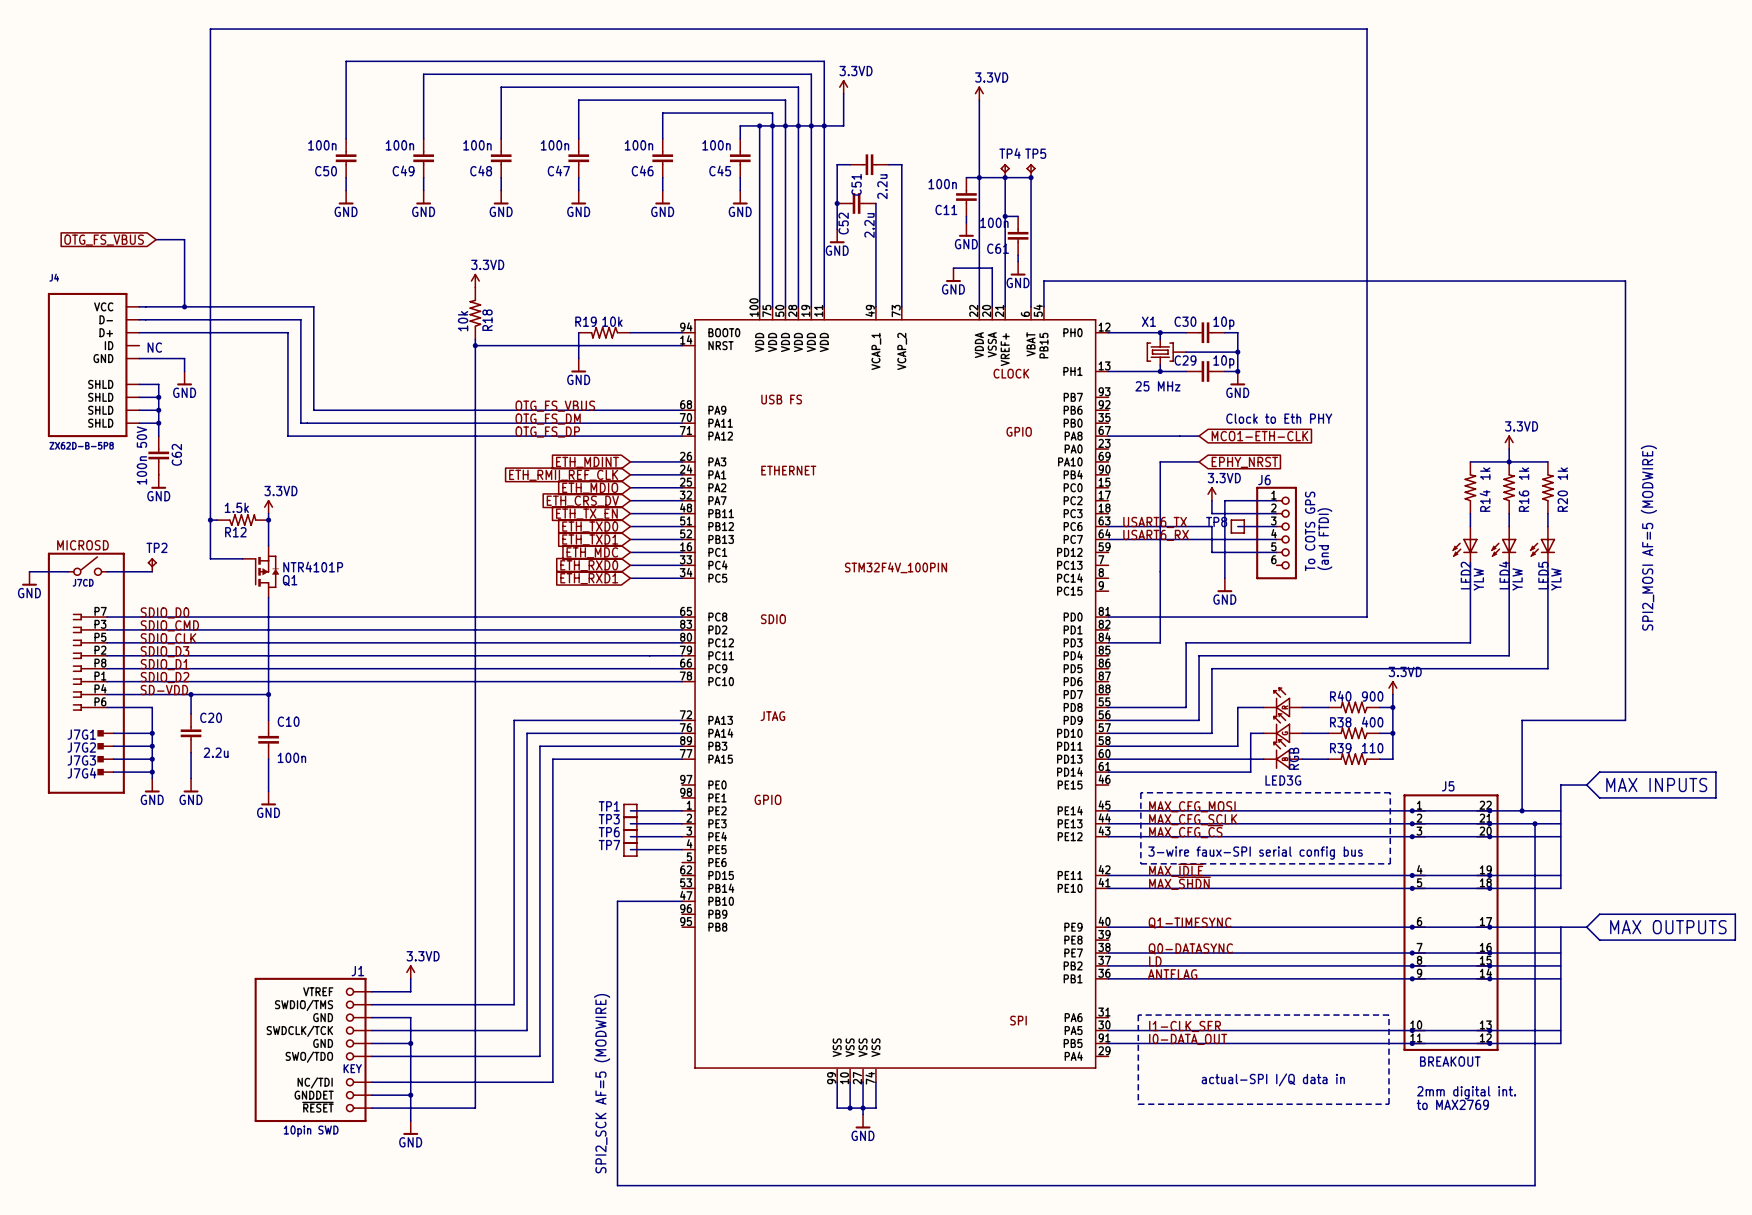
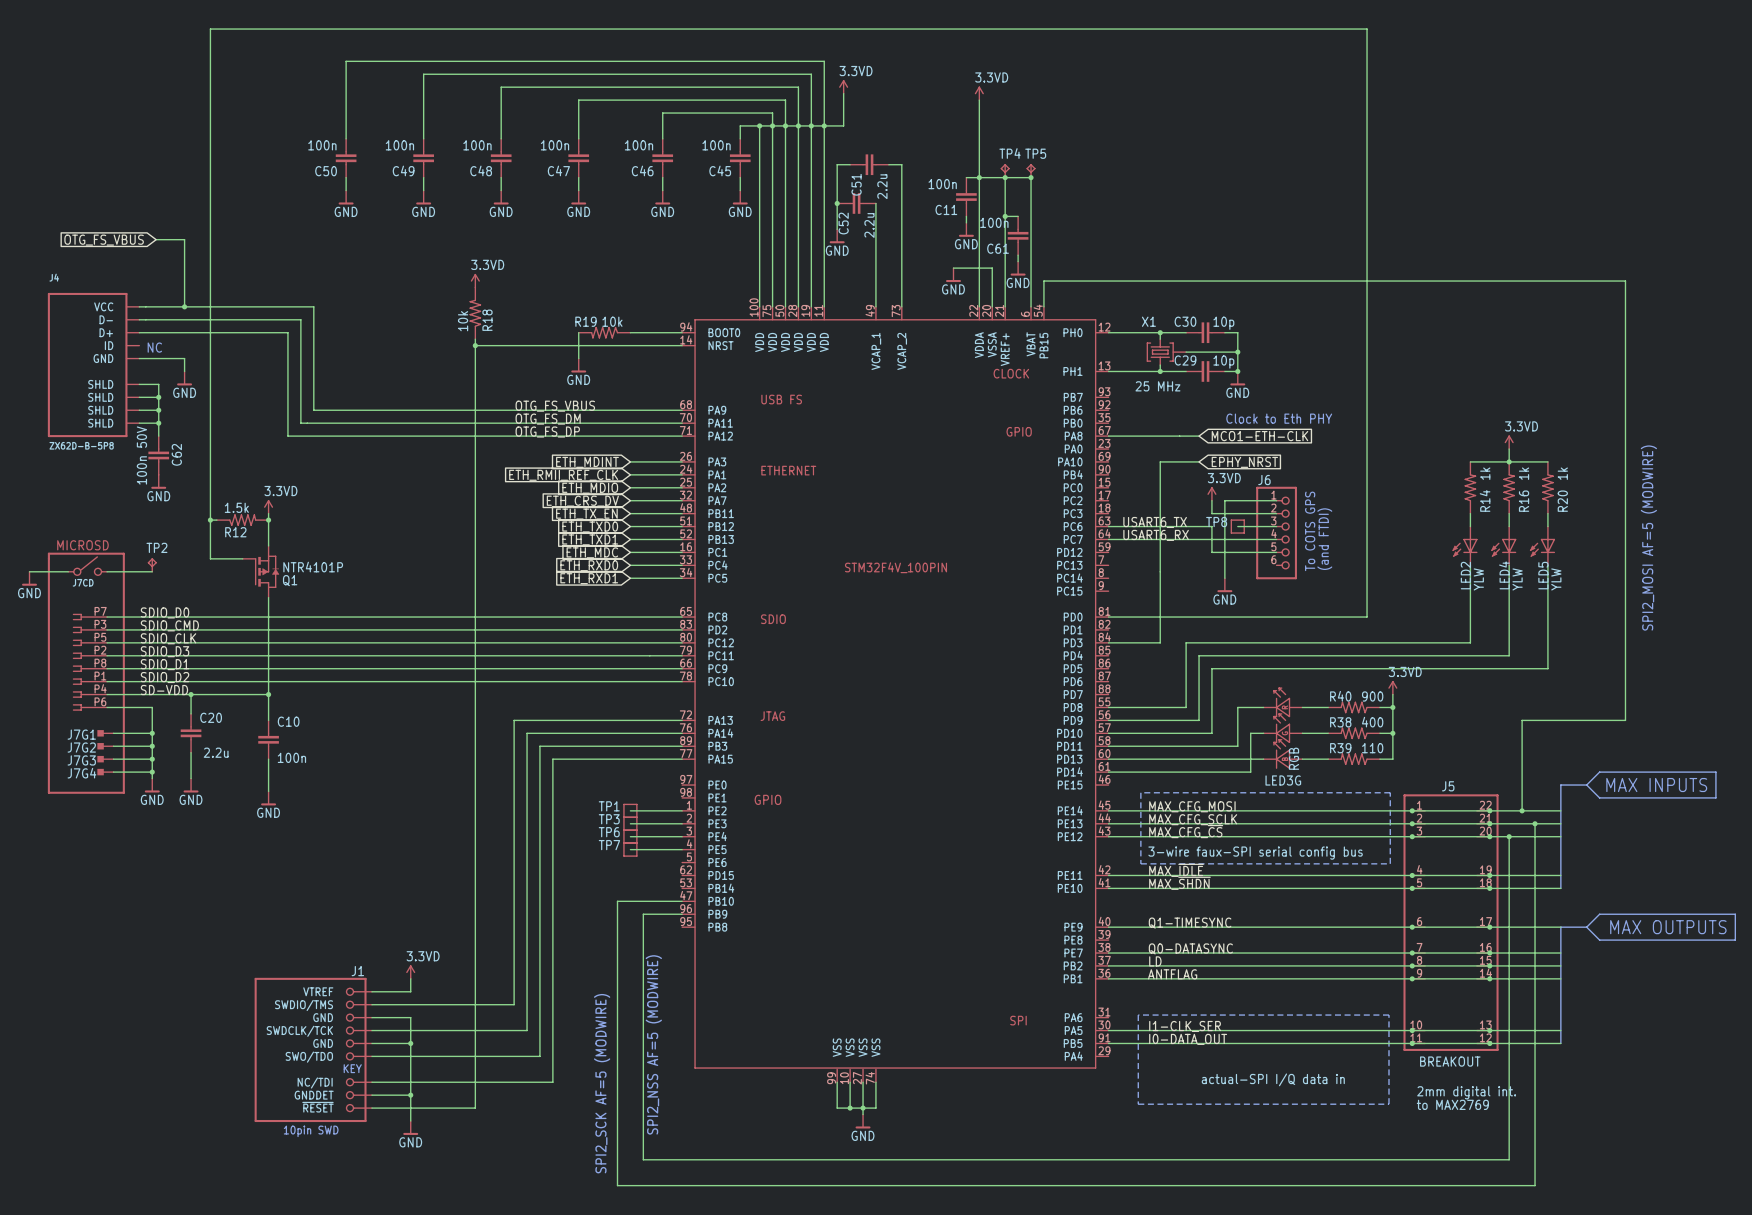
wire: none -> (1509, 836) (1509, 1159) (643, 1159) (643, 914) (682, 914)
junction: none -> (1509, 836)
text: none -> SPI2_NSS AF=5 (MODWIRE) (653, 1044)

